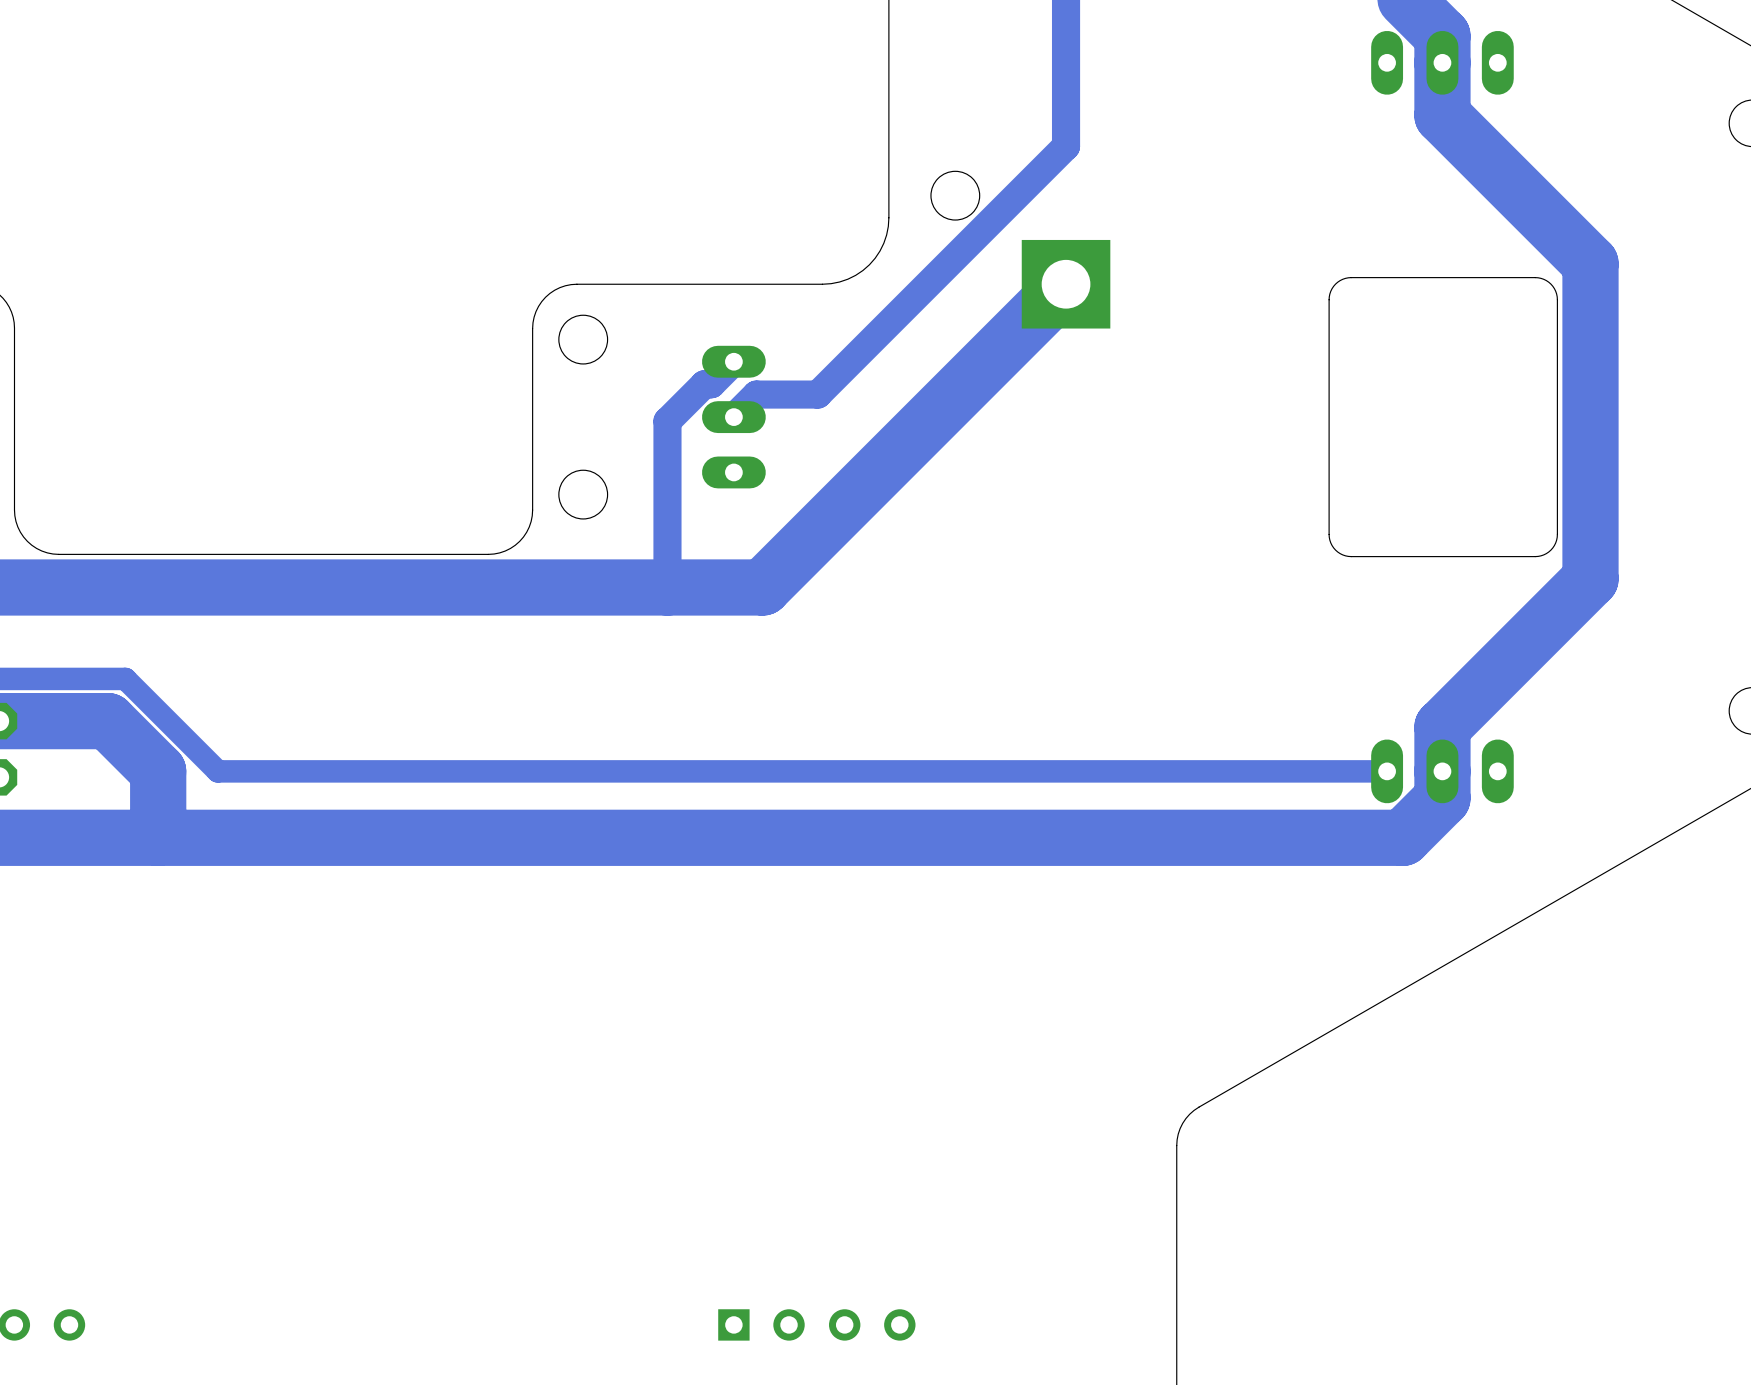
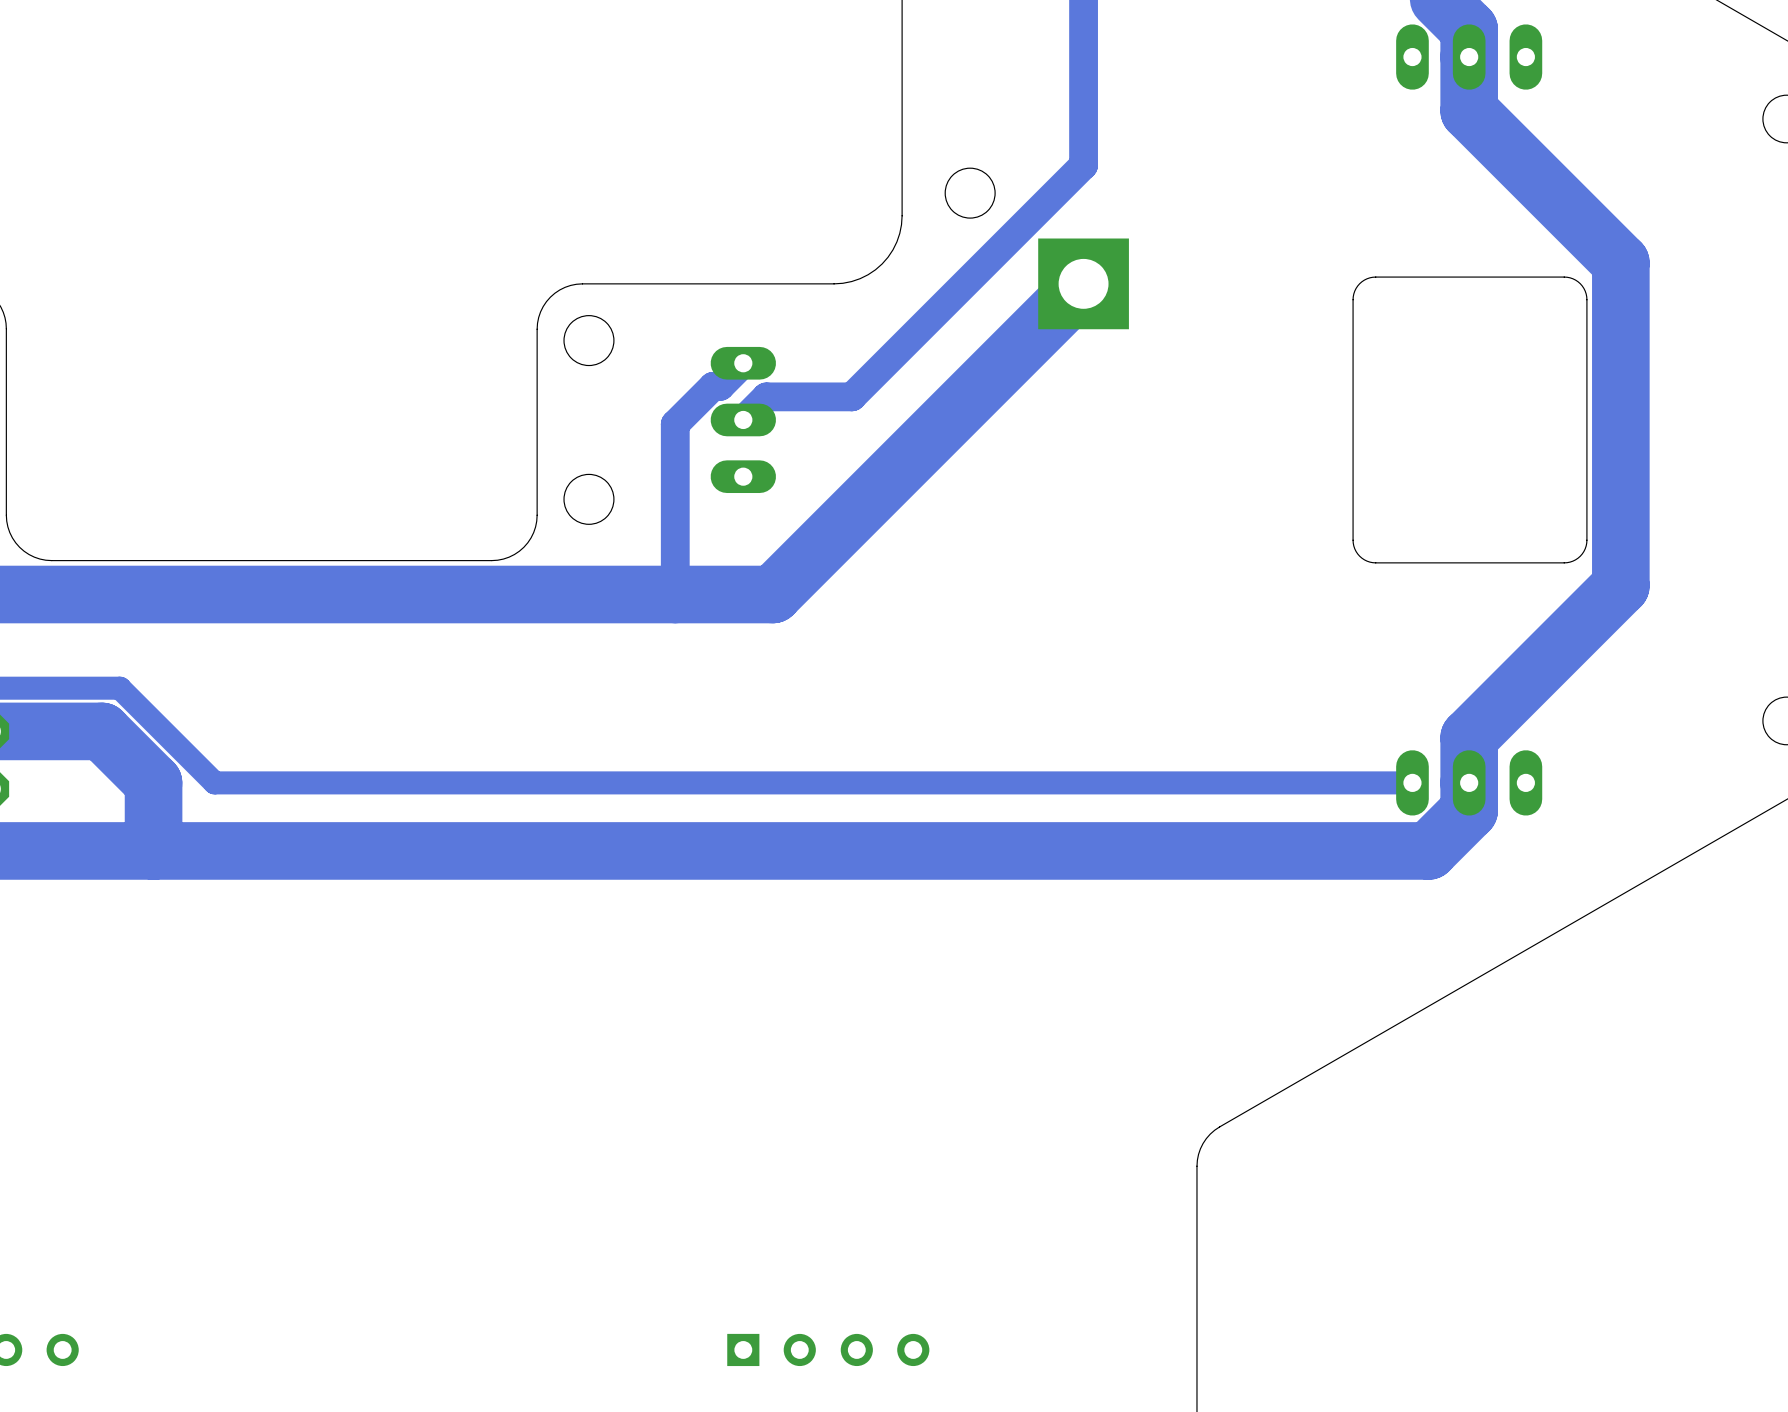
track: (1066, 146) (817, 394) -> (1083, 142) (1083, 165) (851, 396) (829, 396)

